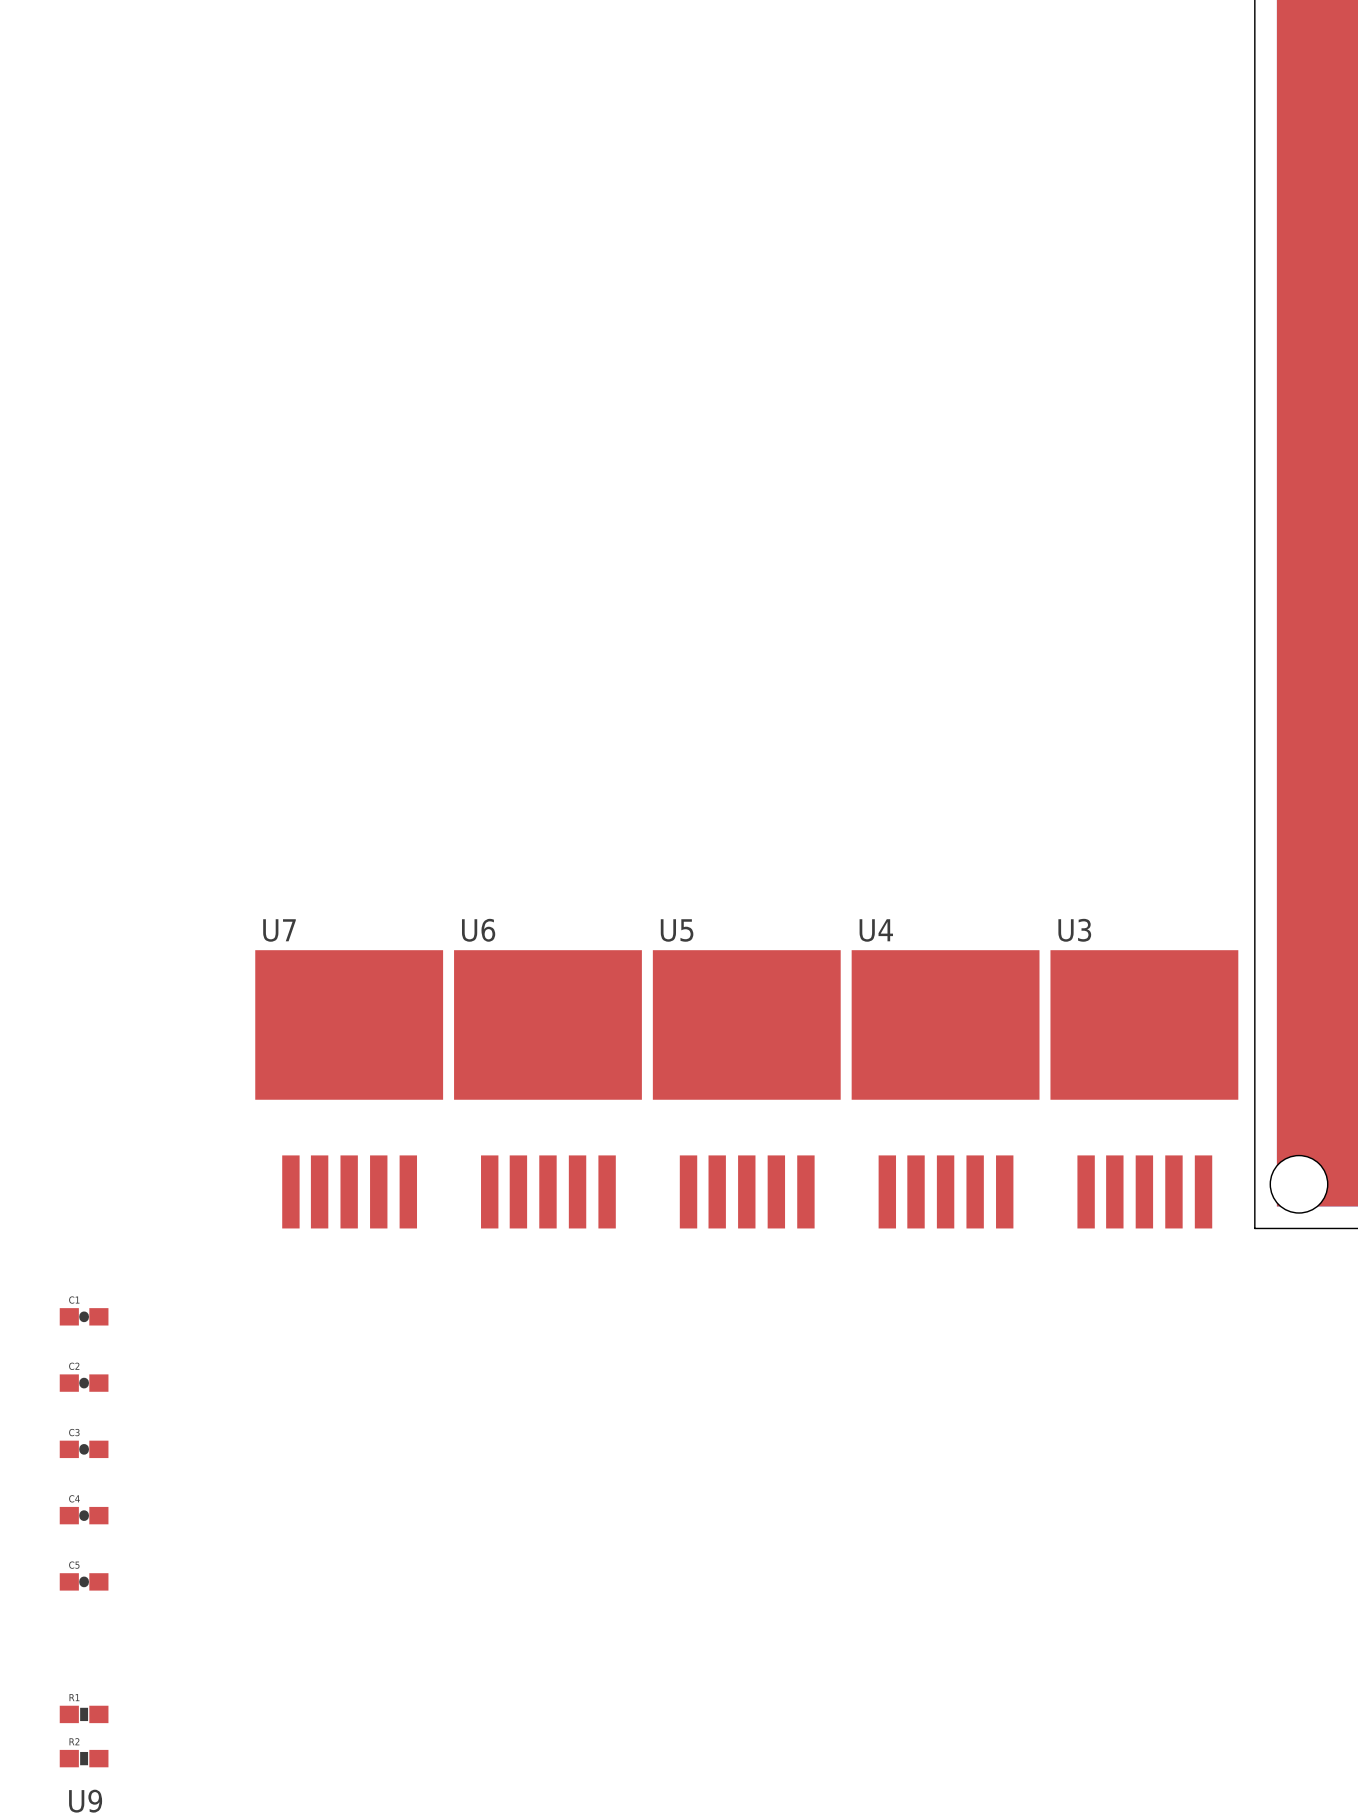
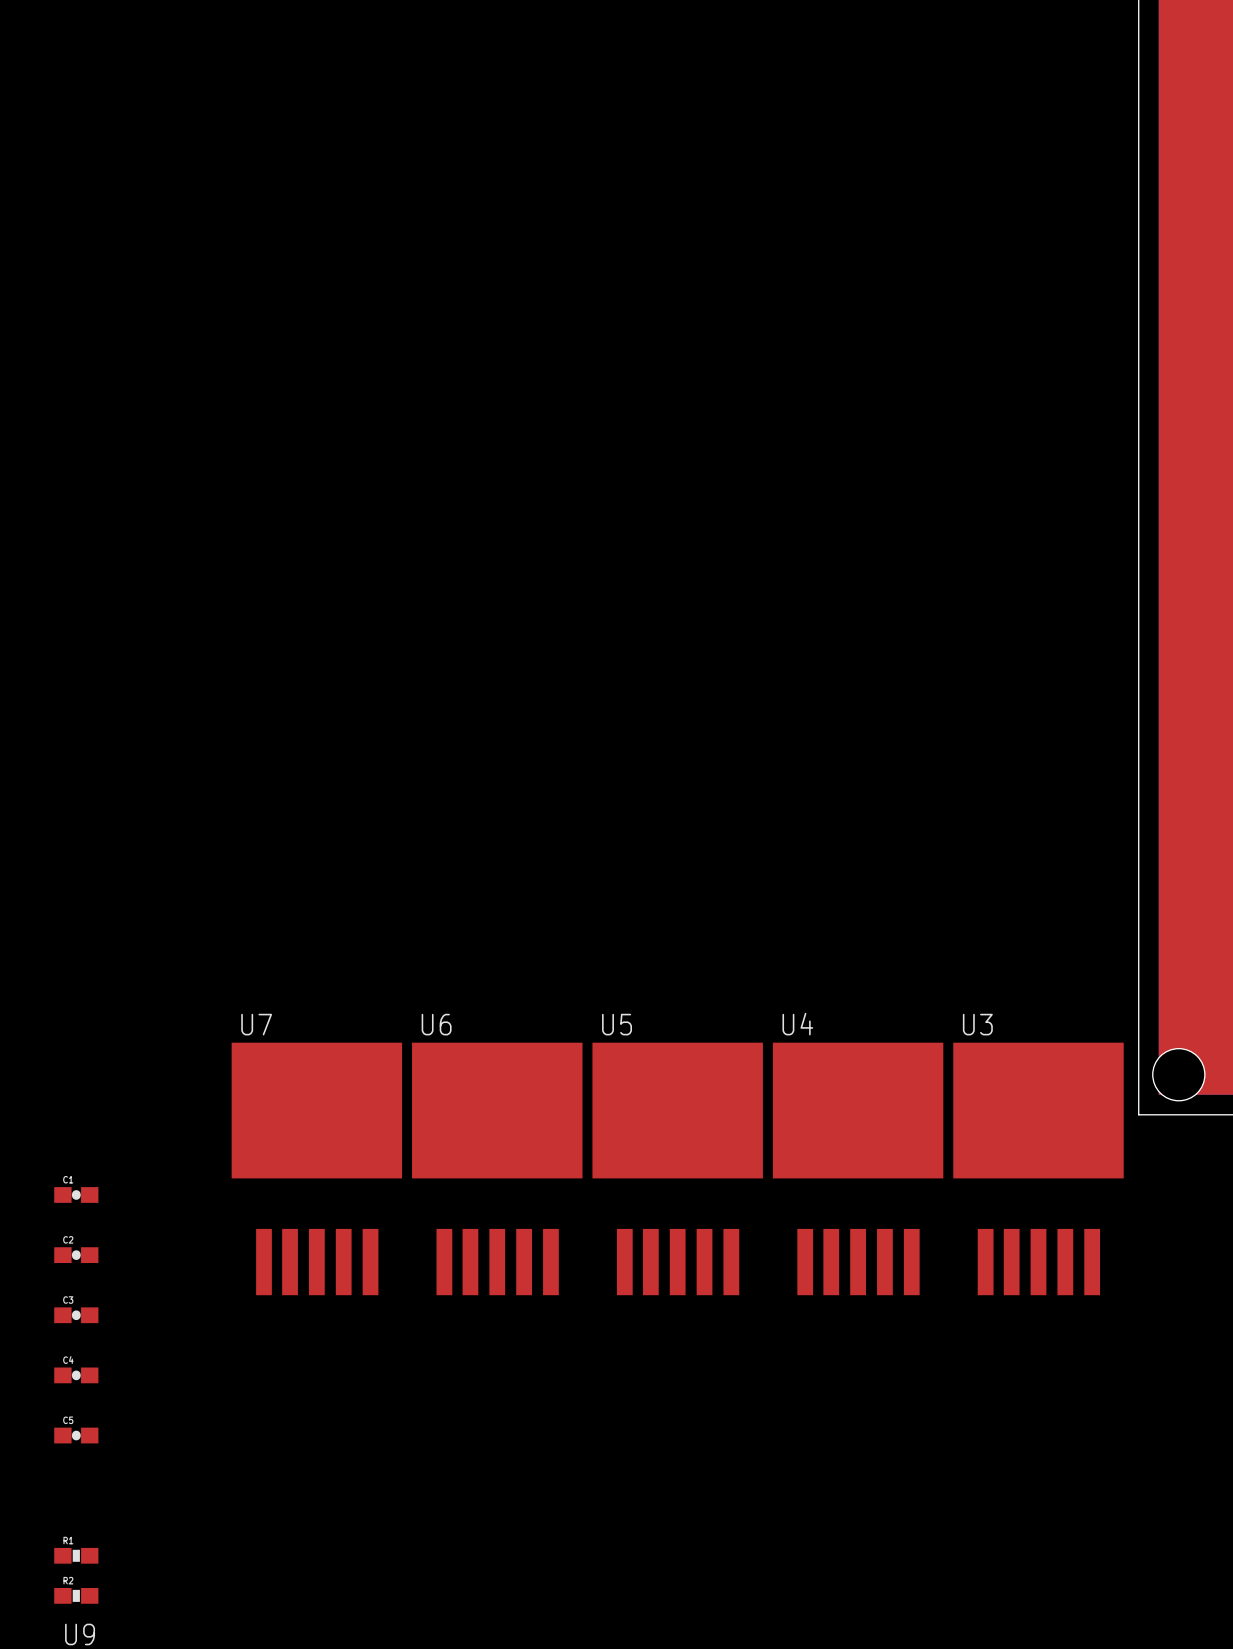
U7 position: (349, 1089) -> (316, 1168)
U6 position: (547, 1089) -> (497, 1168)
U5 position: (746, 1089) -> (677, 1168)
U4 position: (945, 1089) -> (858, 1168)
U3 position: (1144, 1089) -> (1038, 1168)

